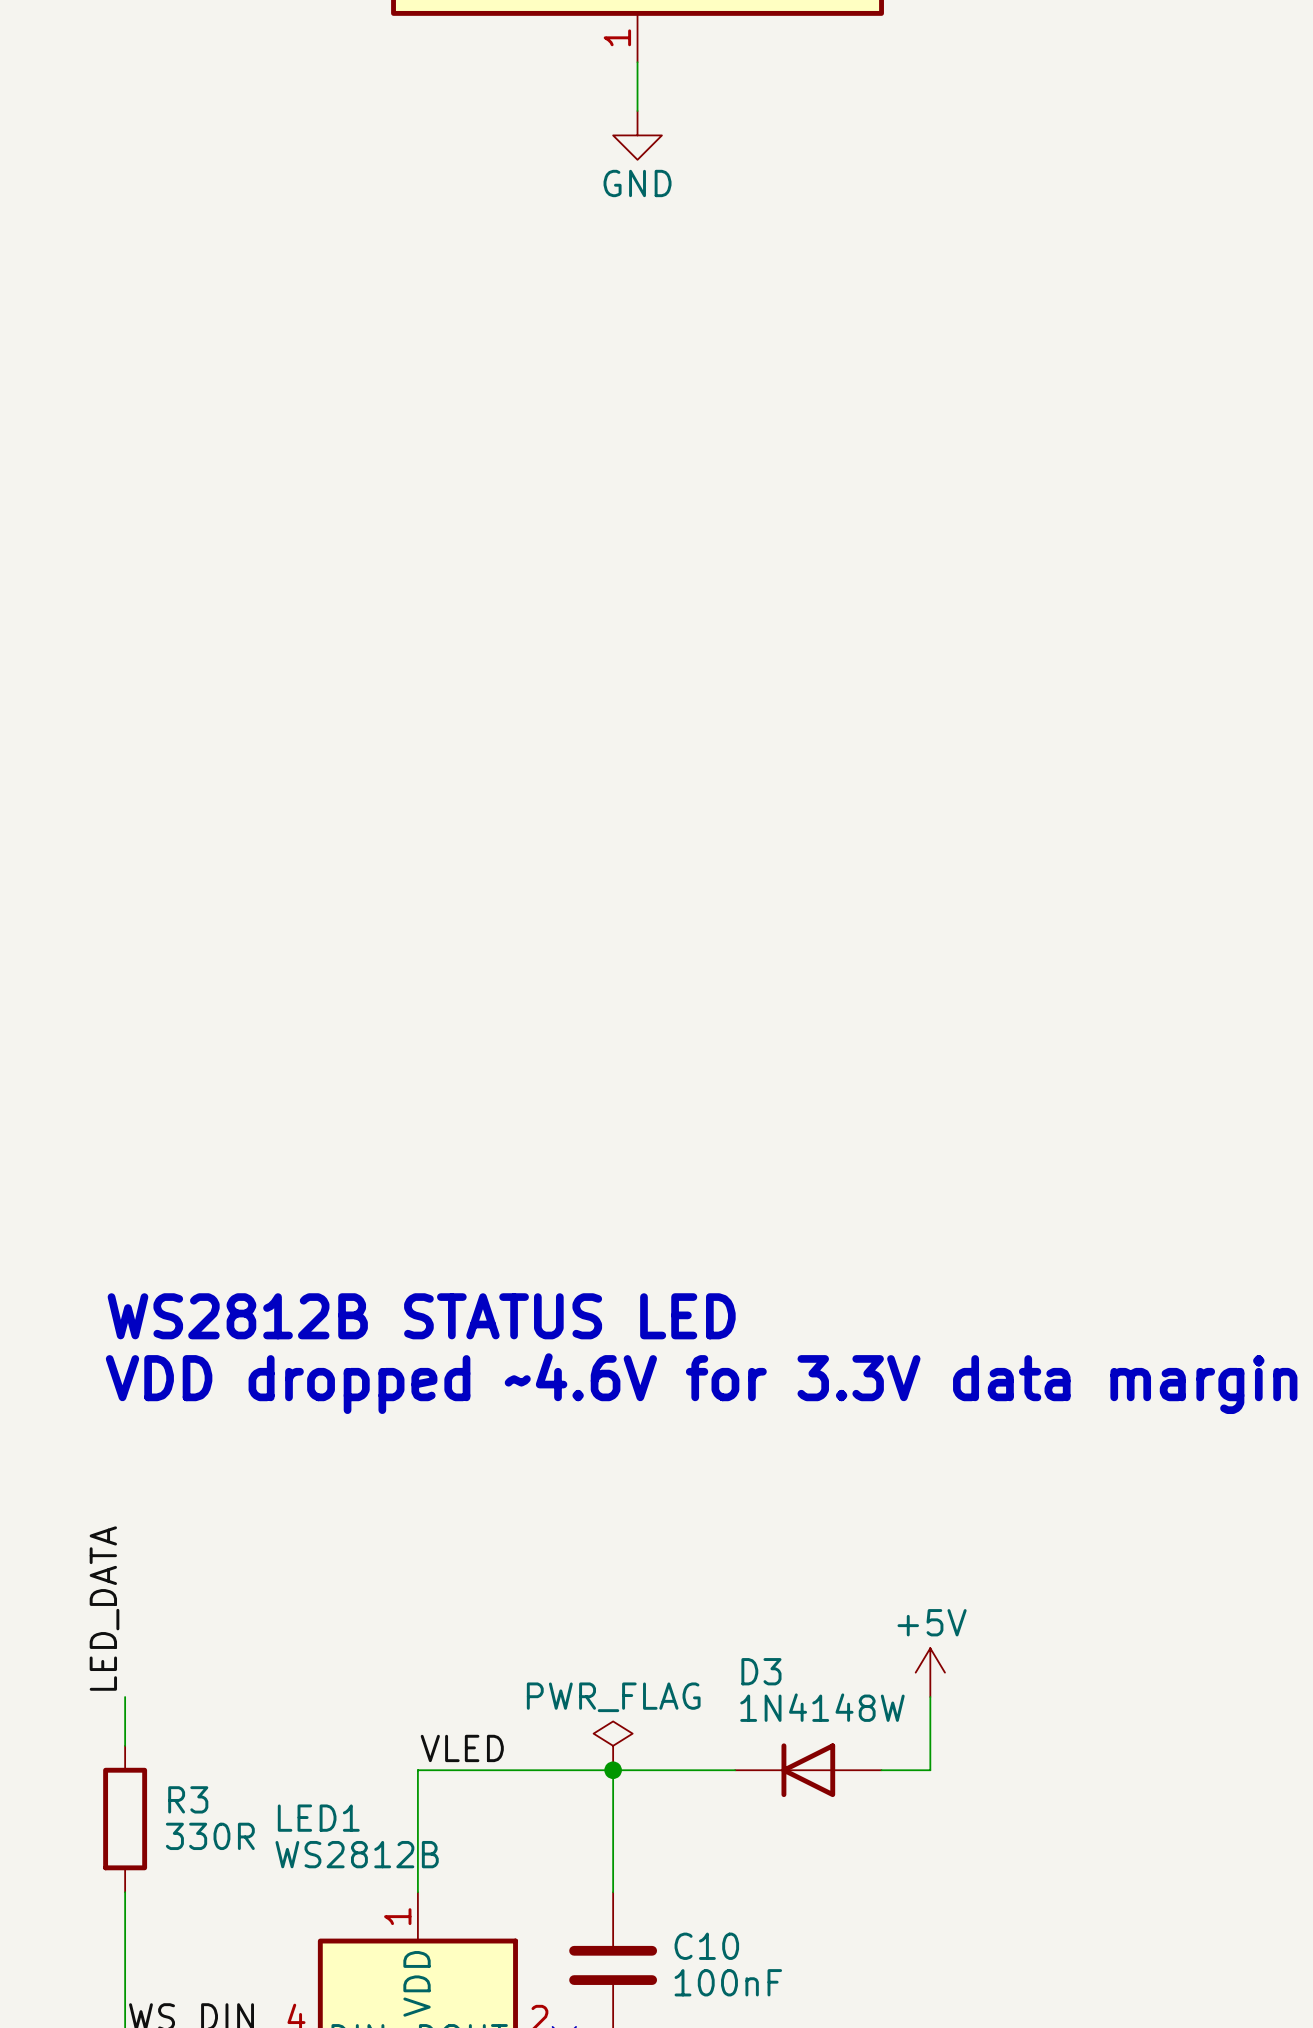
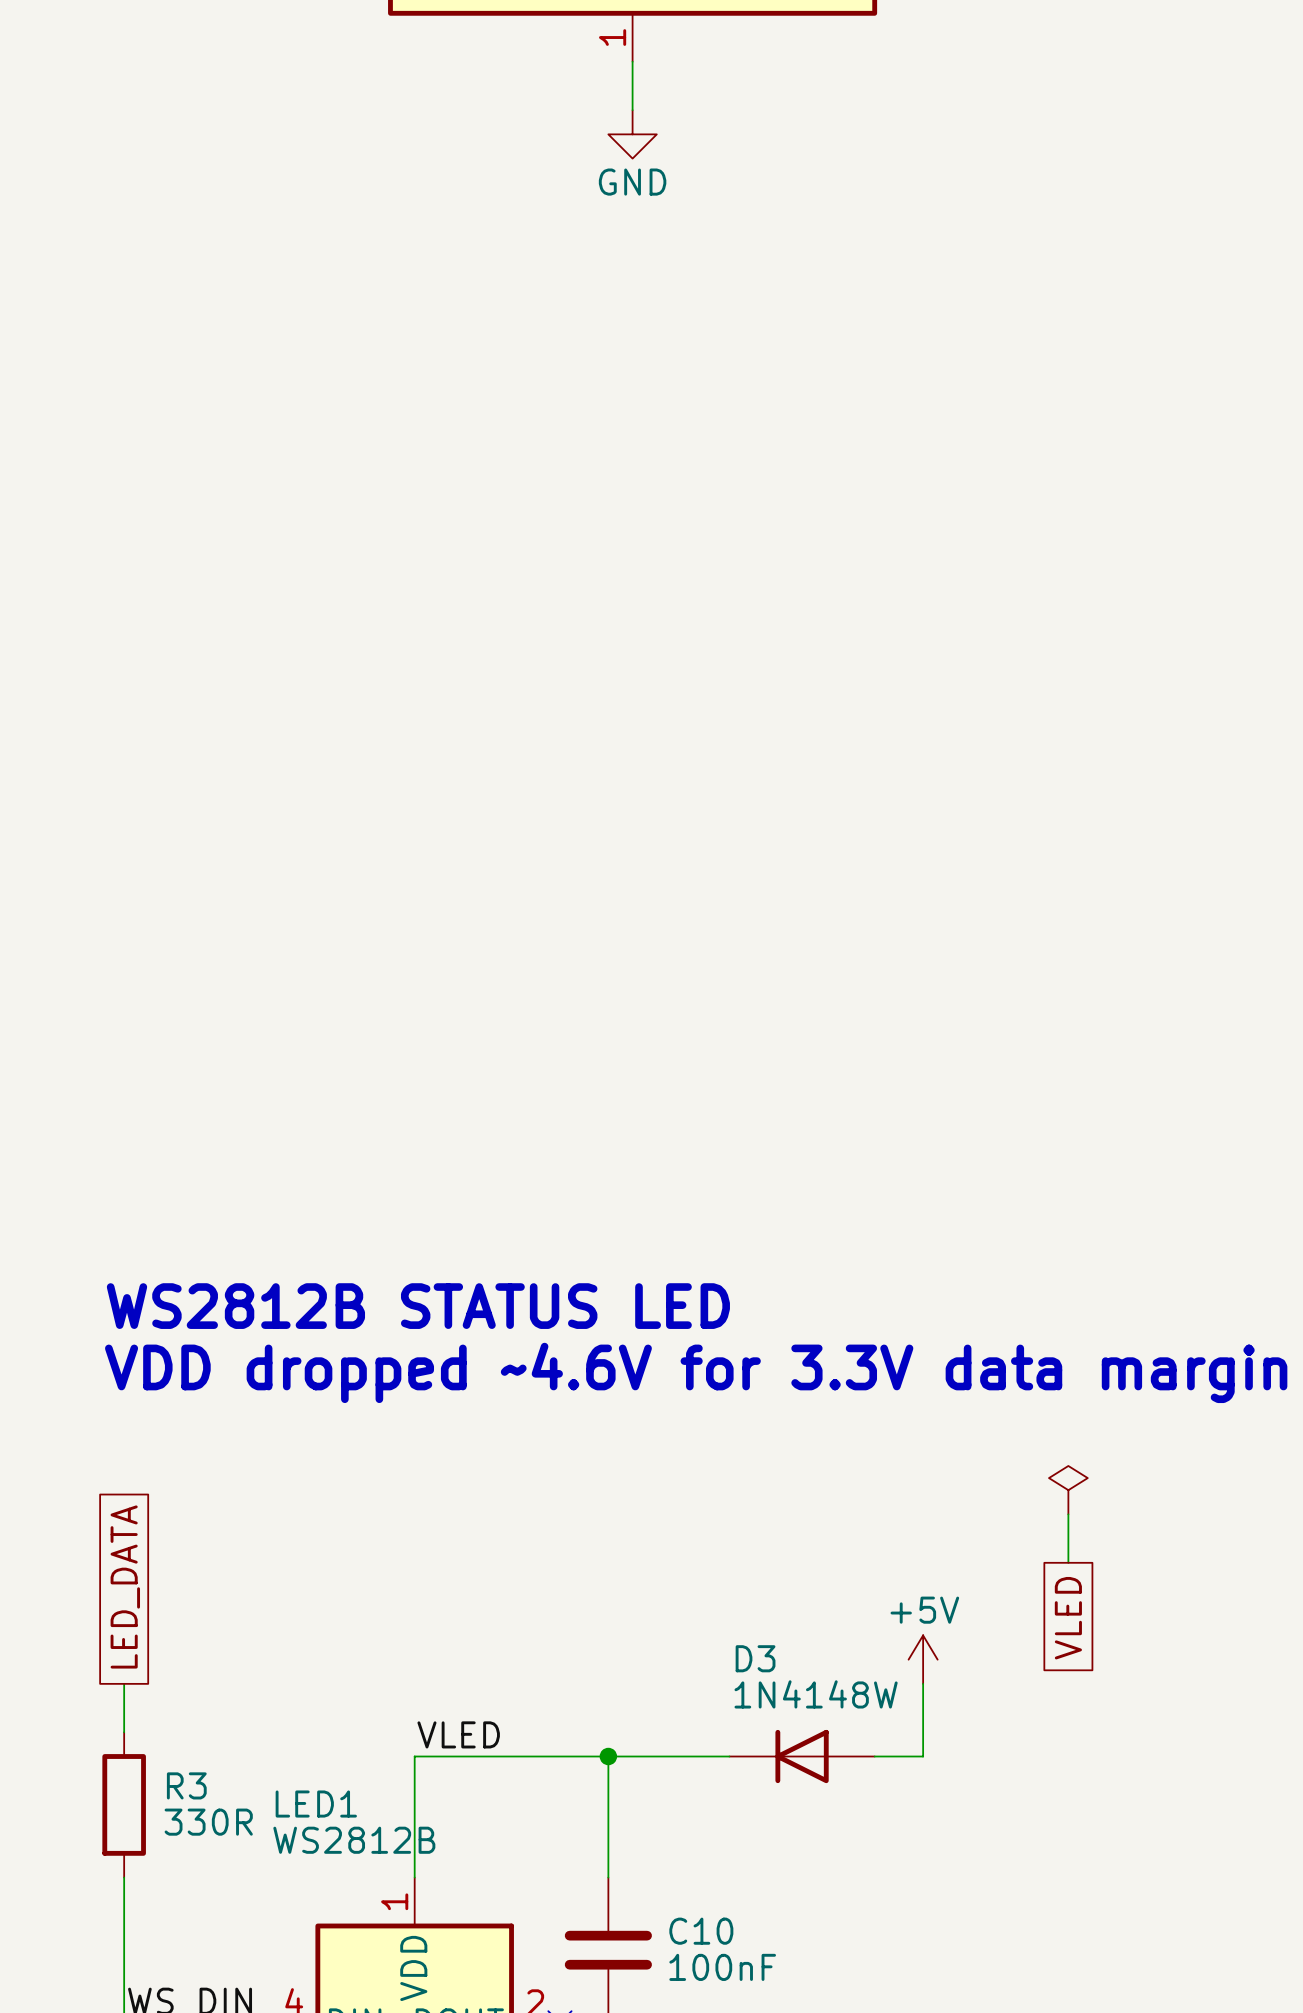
power symbol: none -> (1068, 1490)
wire: none -> (1068, 1514) (1068, 1562)
global label: none -> LED_DATA (125, 1586)
label: LED_DATA (104, 1608) -> none
global label: none -> VLED (1068, 1618)
power symbol: PWR_FLAG (613, 1745) -> none

